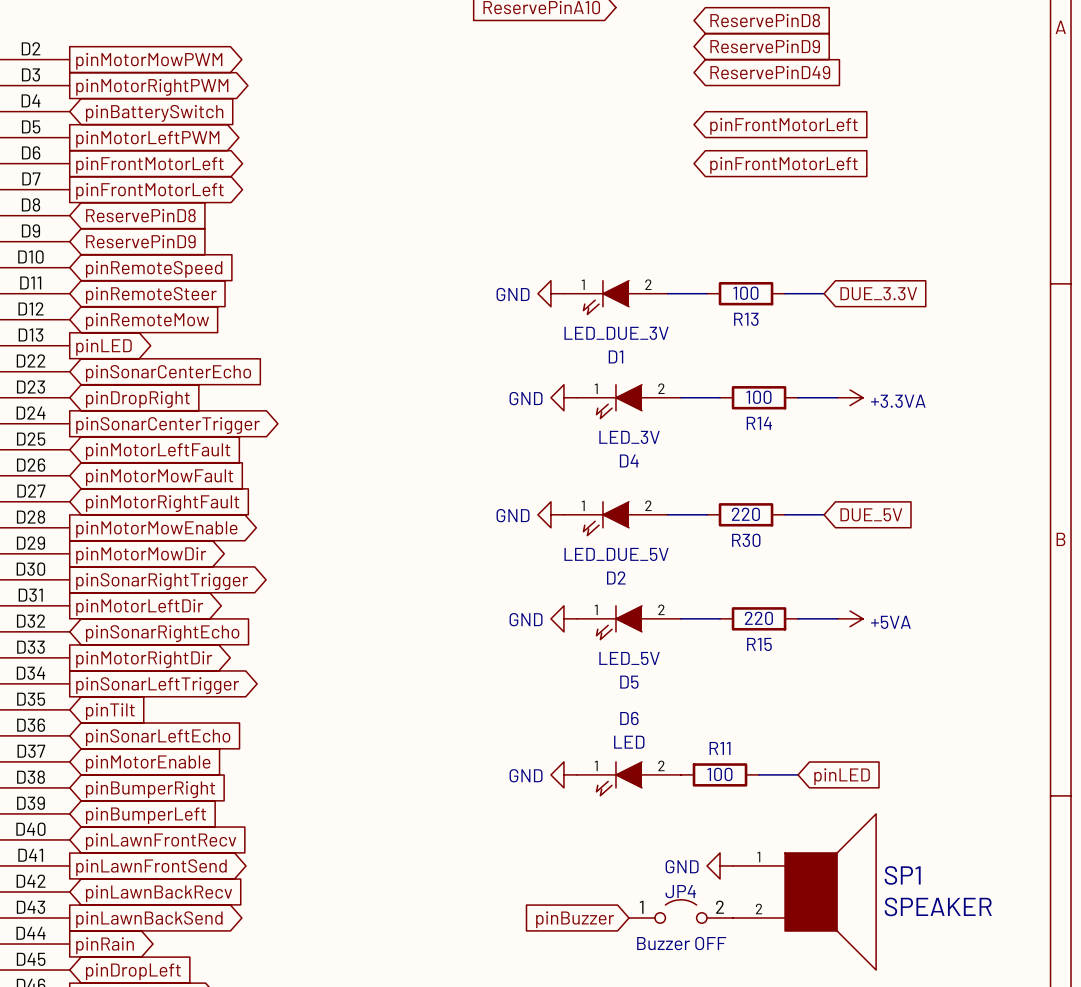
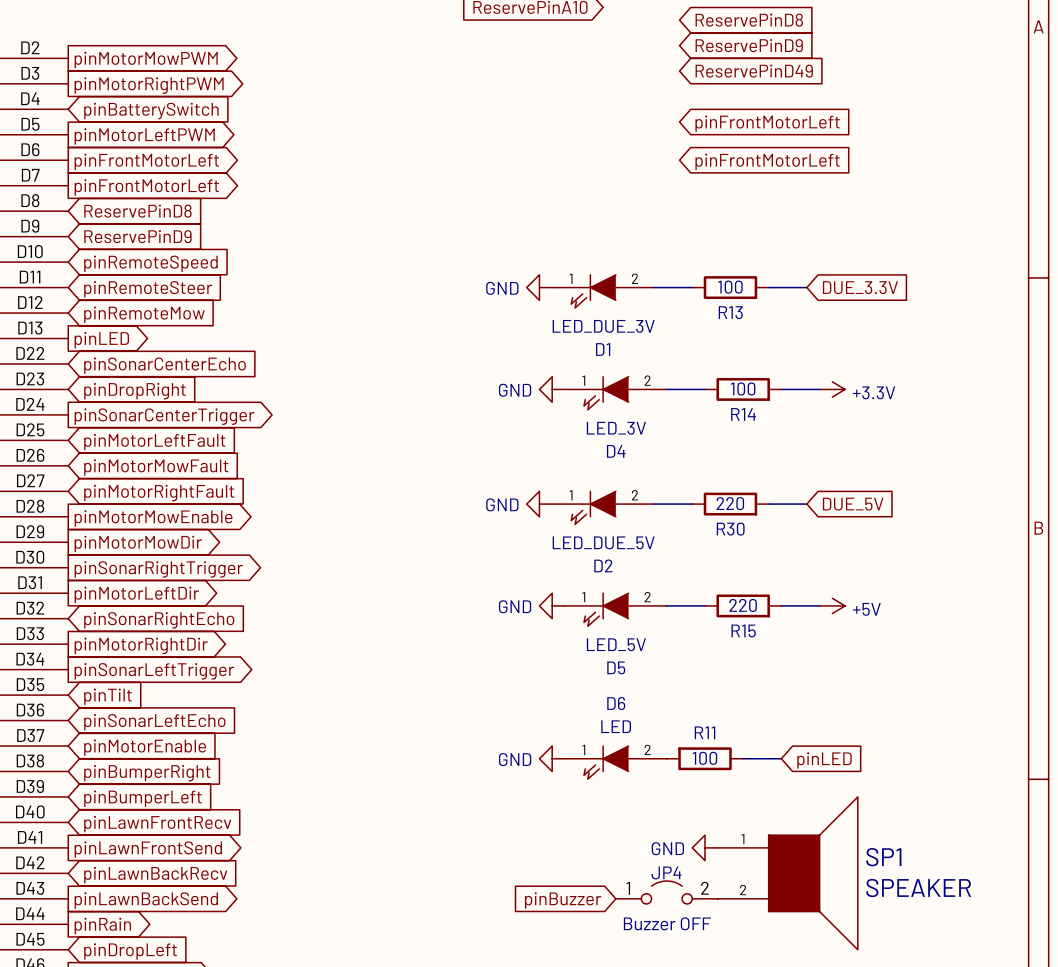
power symbol: +3.3VA (850, 397) -> +3.3V (832, 389)
power symbol: +5VA (850, 618) -> +5V (832, 605)

